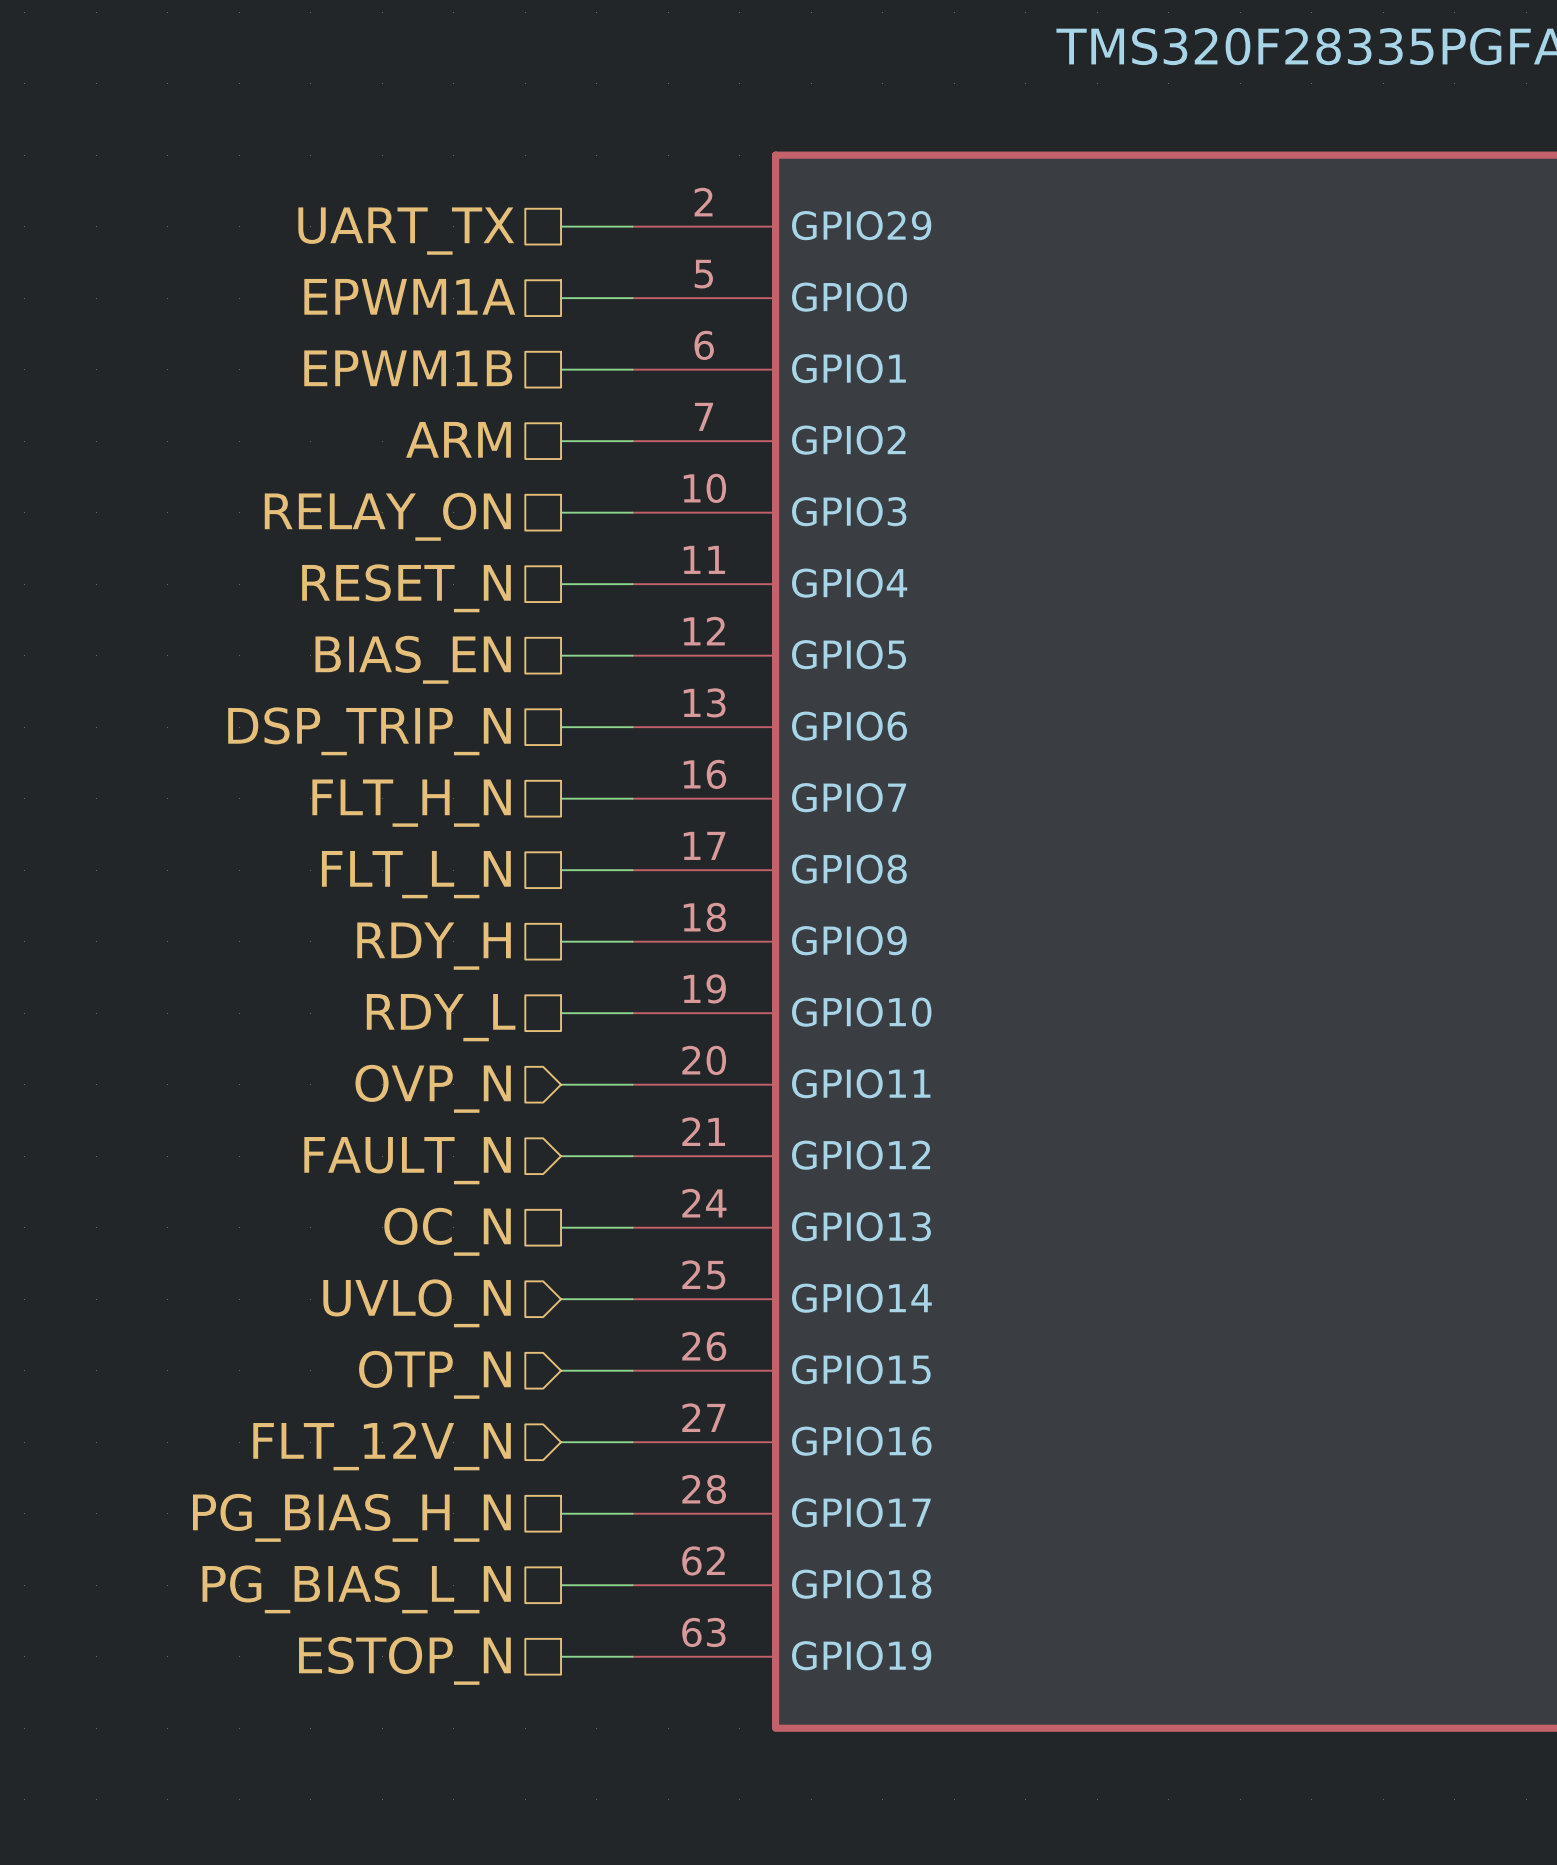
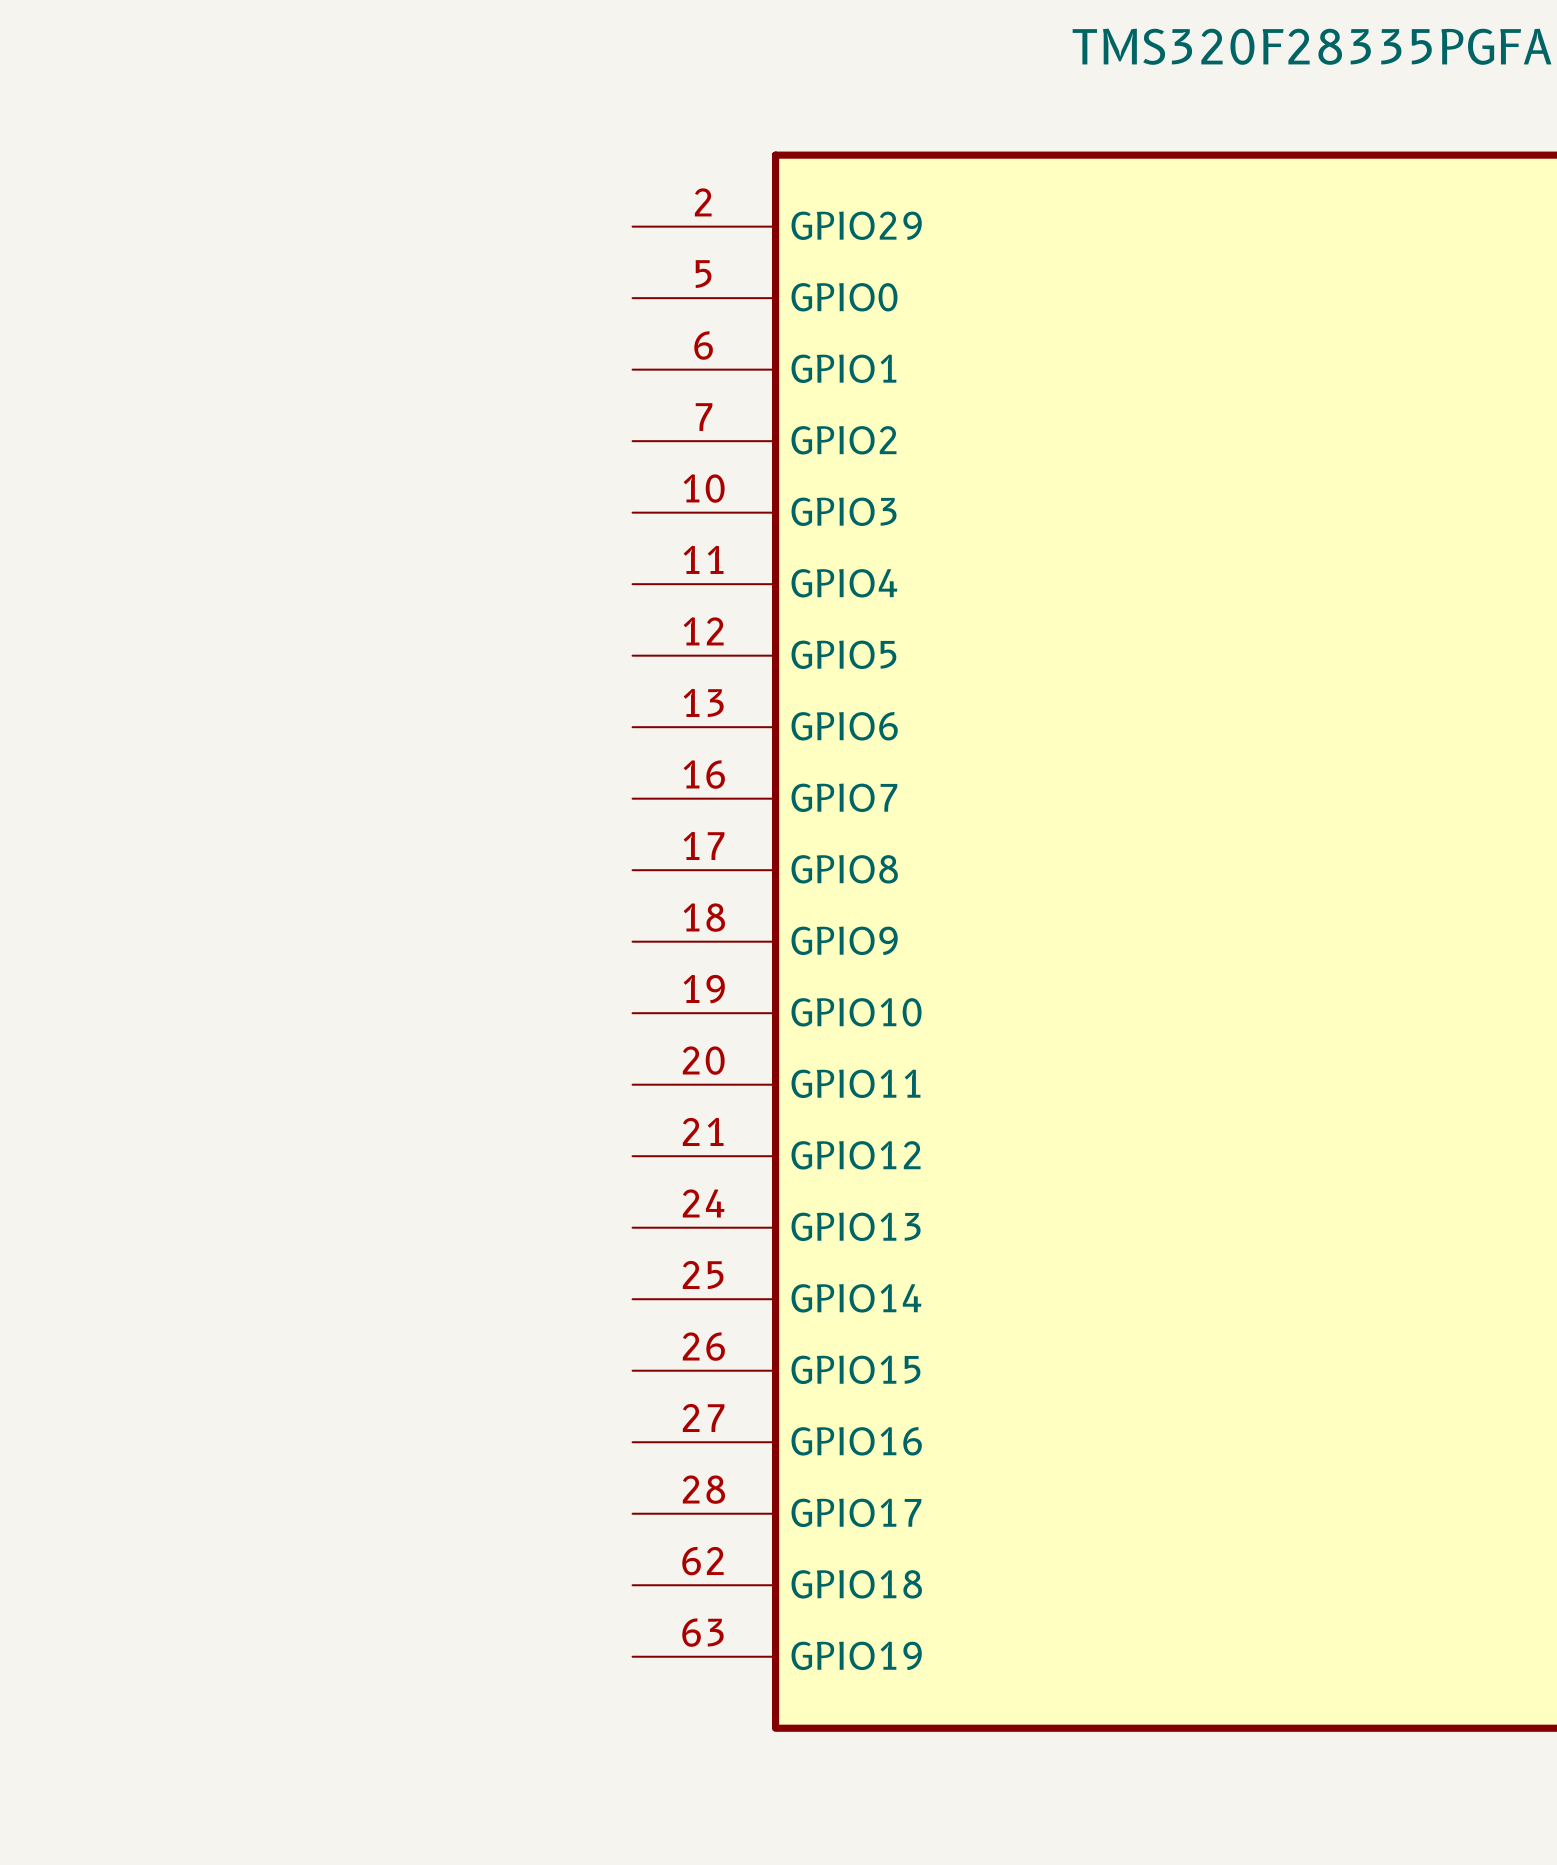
wire: (561, 226) (632, 226) -> none
hierarchical label: UART_TX (406, 231) -> none
hierarchical label: EPWM1A (409, 296) -> none
wire: (561, 298) (632, 298) -> none
hierarchical label: EPWM1B (408, 368) -> none
wire: (561, 369) (632, 369) -> none
hierarchical label: ARM (458, 439) -> none
wire: (561, 441) (632, 441) -> none
wire: (561, 512) (632, 512) -> none
hierarchical label: RELAY_ON (387, 516) -> none
wire: (561, 584) (632, 584) -> none
hierarchical label: RESET_N (406, 588) -> none
wire: (561, 655) (632, 655) -> none
hierarchical label: BIAS_EN (413, 659) -> none
wire: (561, 727) (632, 727) -> none
hierarchical label: DSP_TRIP_N (369, 731) -> none
wire: (561, 798) (632, 798) -> none
hierarchical label: FLT_H_N (411, 803) -> none
wire: (561, 870) (632, 870) -> none
hierarchical label: FLT_L_N (416, 874) -> none
wire: (561, 941) (632, 941) -> none
hierarchical label: RDY_H (434, 946) -> none
wire: (561, 1013) (632, 1013) -> none
hierarchical label: RDY_L (441, 1017) -> none
wire: (561, 1084) (632, 1084) -> none
hierarchical label: OVP_N (433, 1088) -> none
wire: (561, 1156) (632, 1156) -> none
hierarchical label: FAULT_N (407, 1160) -> none
wire: (561, 1227) (632, 1227) -> none
hierarchical label: OC_N (447, 1231) -> none
wire: (561, 1299) (632, 1299) -> none
hierarchical label: UVLO_N (417, 1303) -> none
wire: (561, 1370) (632, 1370) -> none
hierarchical label: OTP_N (434, 1374) -> none
wire: (561, 1442) (632, 1442) -> none
hierarchical label: FLT_12V_N (382, 1446) -> none
wire: (561, 1513) (632, 1513) -> none
hierarchical label: PG_BIAS_H_N (351, 1517) -> none
wire: (561, 1585) (632, 1585) -> none
hierarchical label: PG_BIAS_L_N (356, 1589) -> none
wire: (561, 1656) (632, 1656) -> none
hierarchical label: ESTOP_N (404, 1660) -> none

